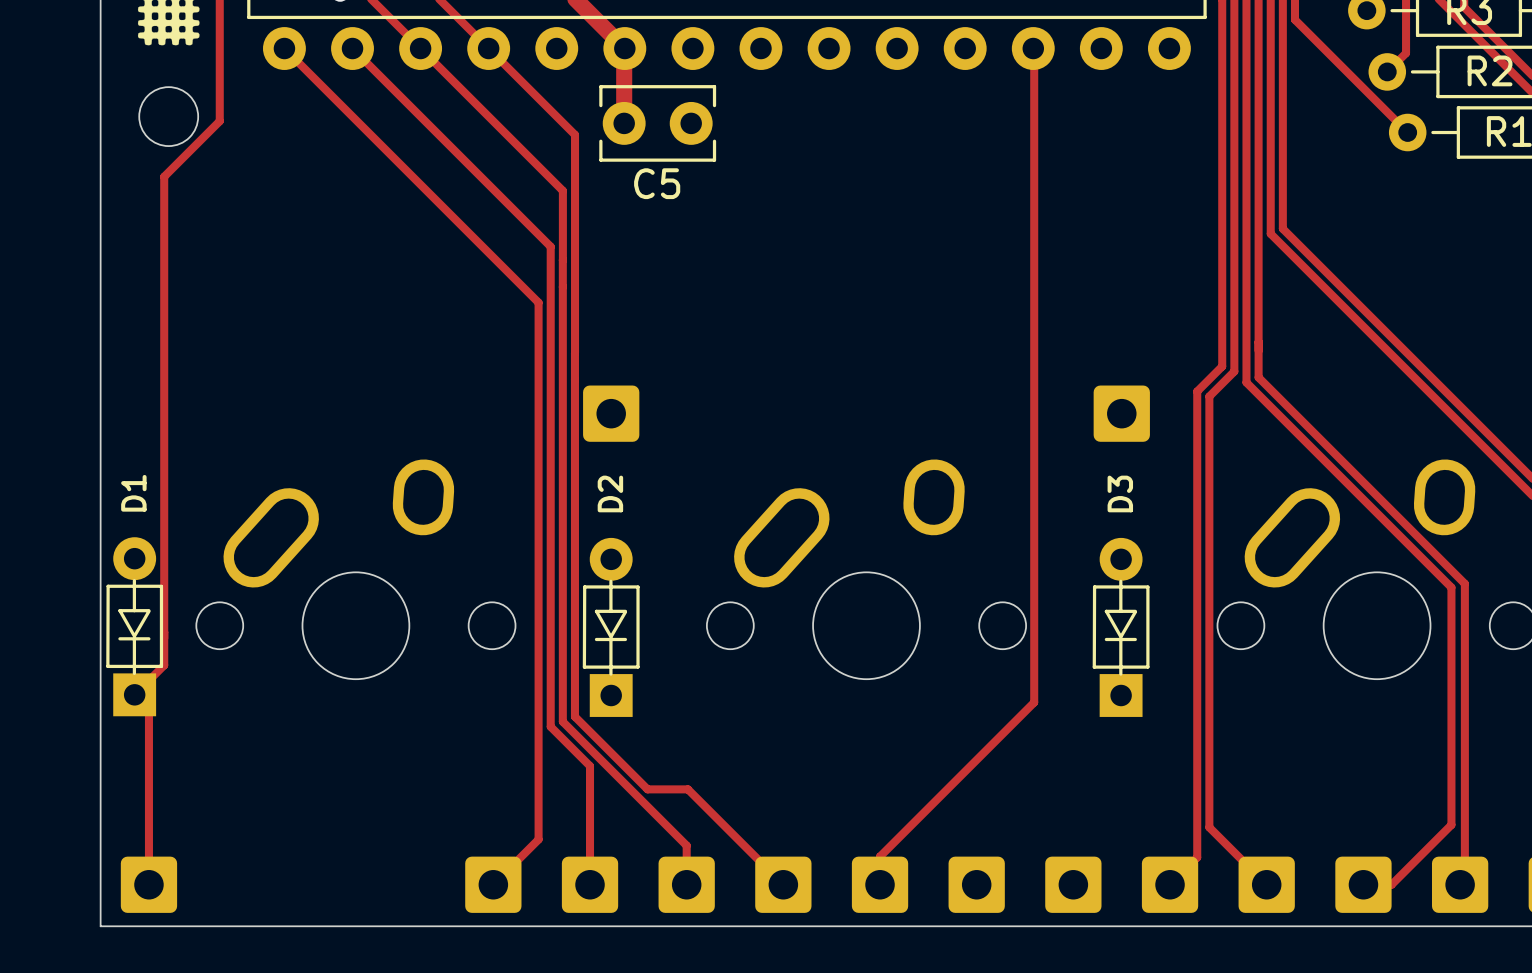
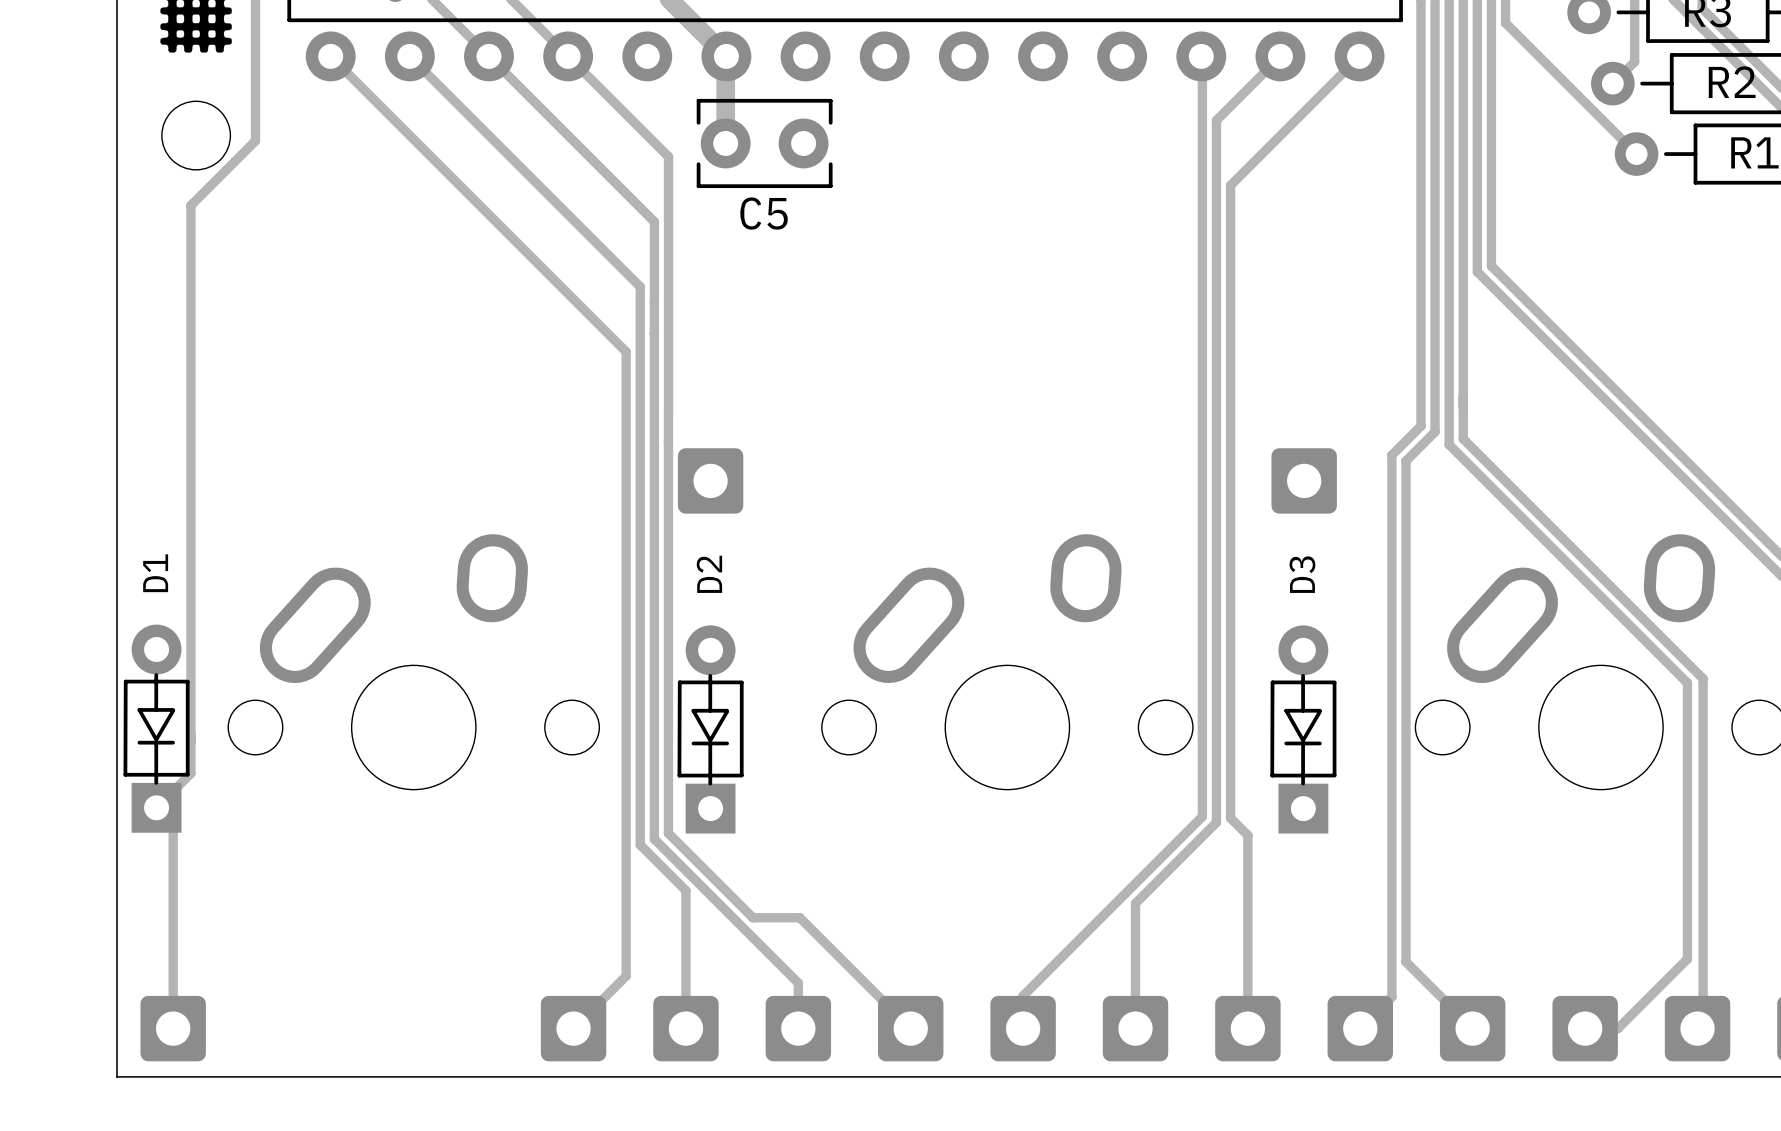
track: none -> (1280, 56) (1216, 120) (1216, 822) (1135, 903) (1135, 1011)
track: none -> (1359, 56) (1230, 185) (1230, 818) (1247, 835) (1247, 1028)

